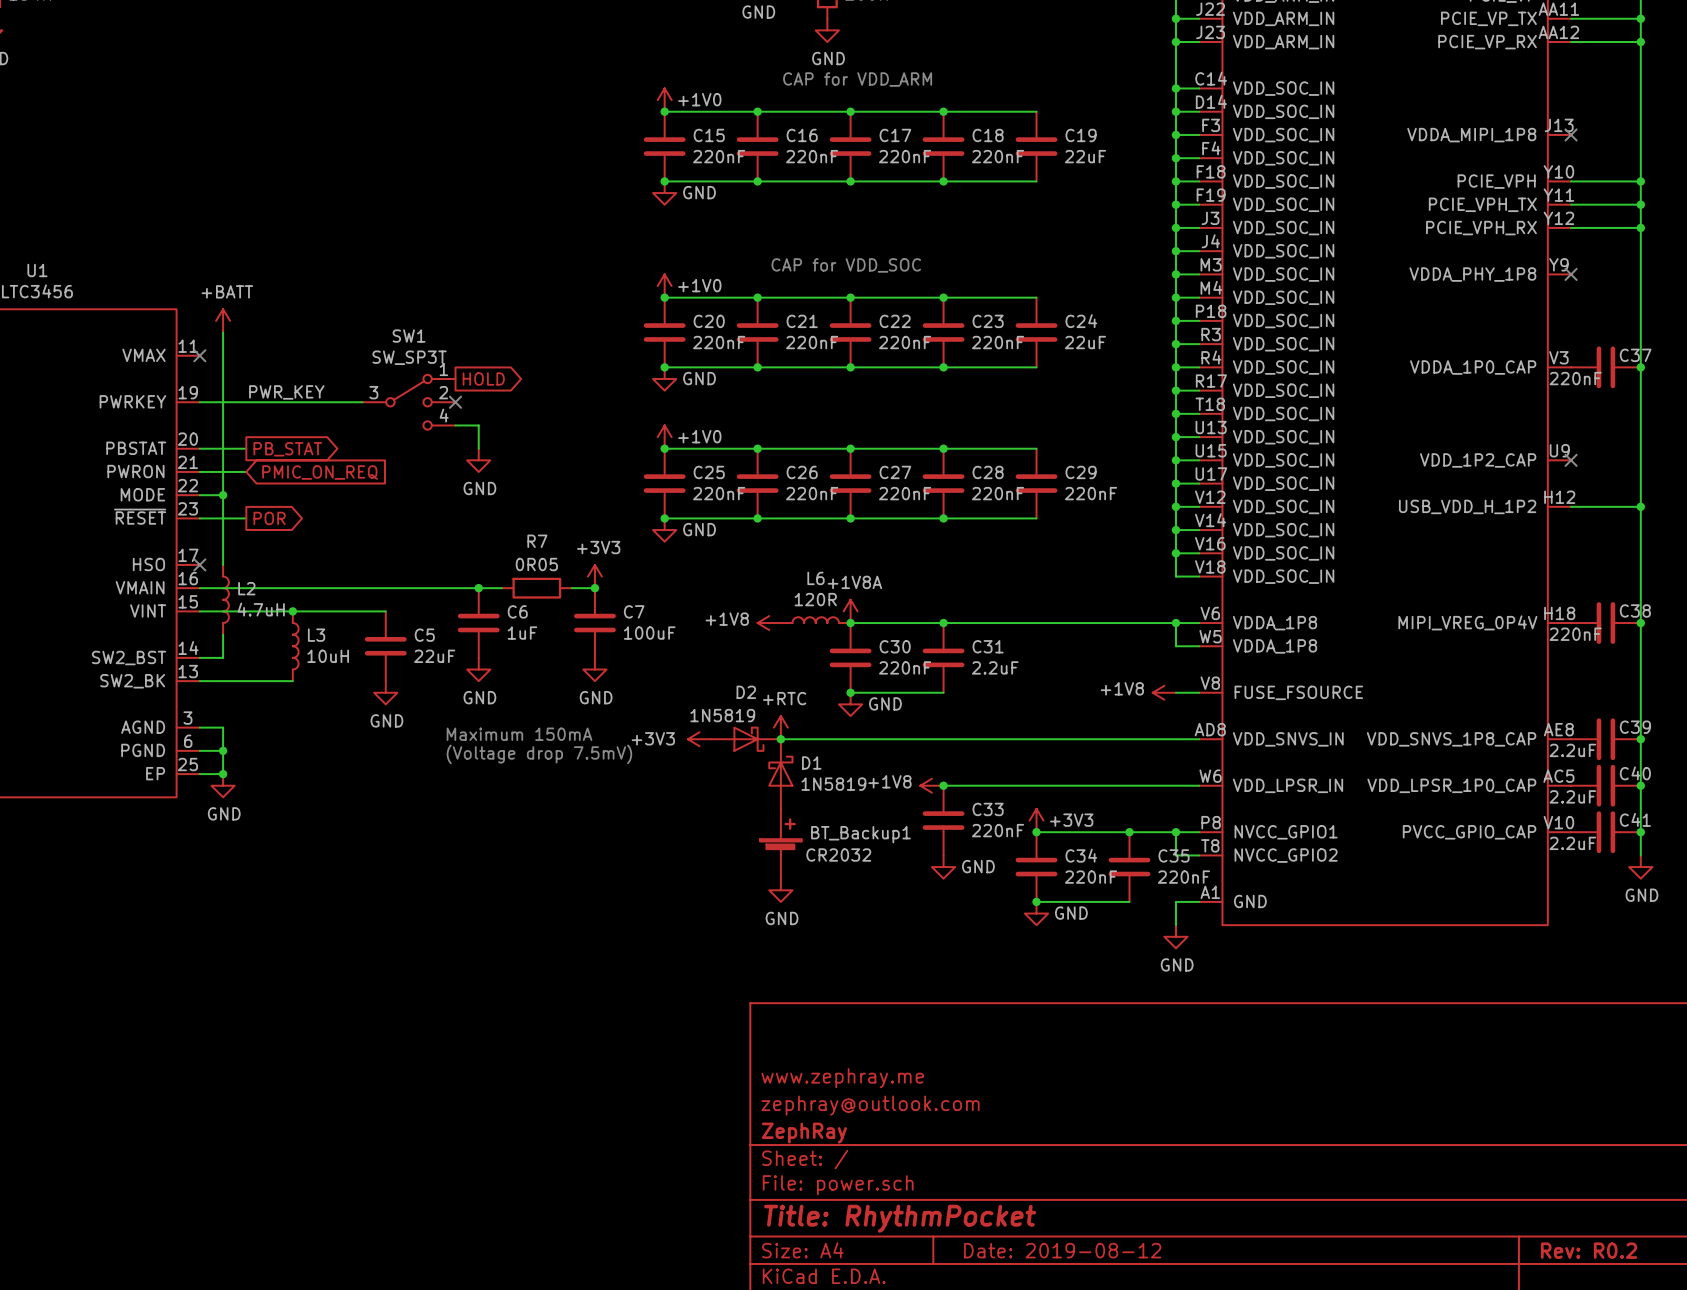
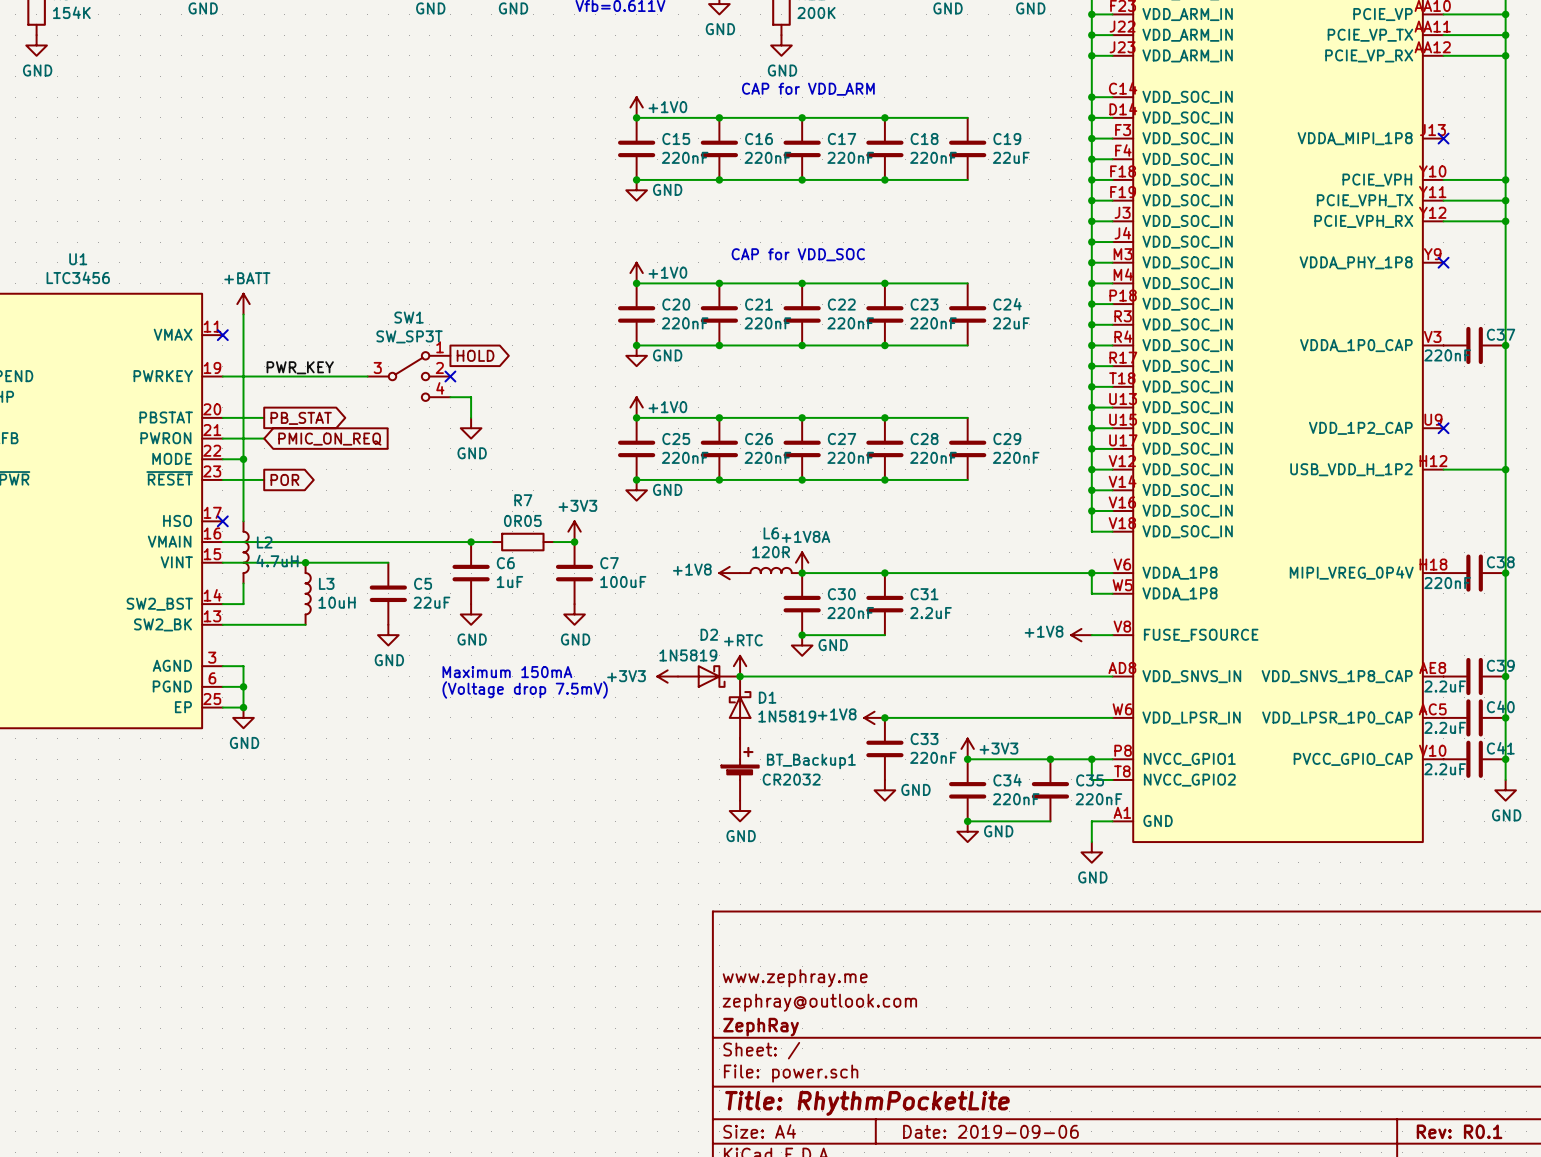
title block: Title: RhythmPocket (900, 1218) -> Title: RhythmPocketLite (867, 1103)
title block: Date: 2019-08-12 (1062, 1250) -> Date: 2019-09-06 (990, 1131)
title block: Rev: R0.2 (1589, 1250) -> Rev: R0.1 (1459, 1131)

